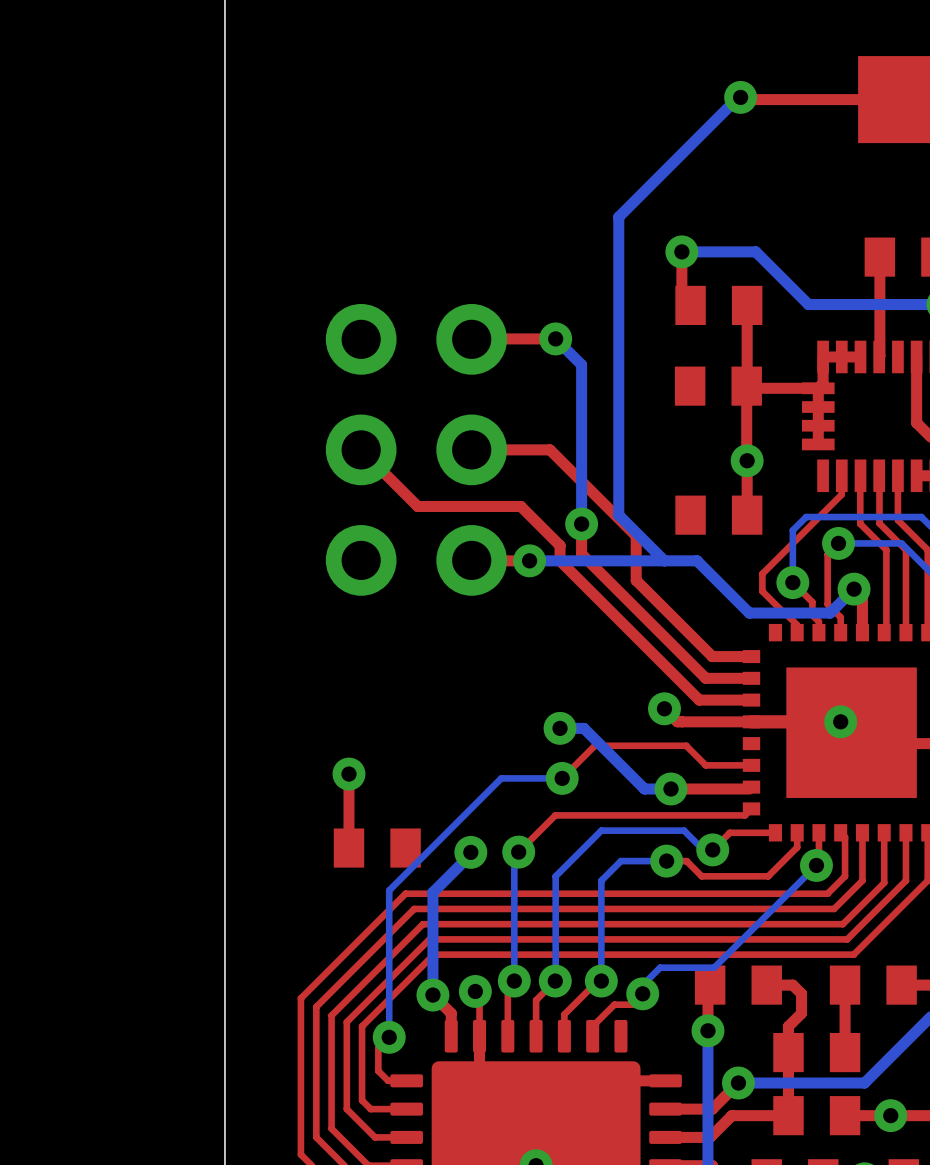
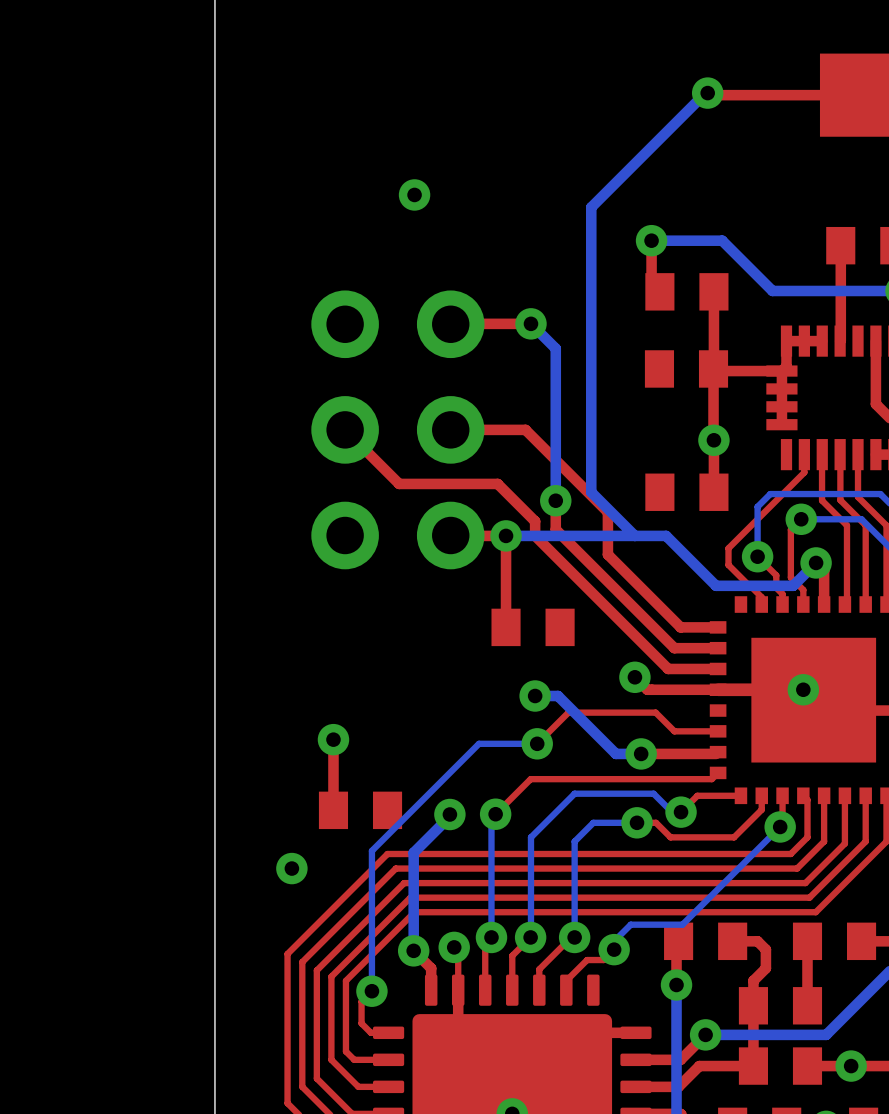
via: none -> (414, 194)
top track: none -> (506, 535) (506, 627)
part: none -> (533, 627)
via: none -> (291, 868)

